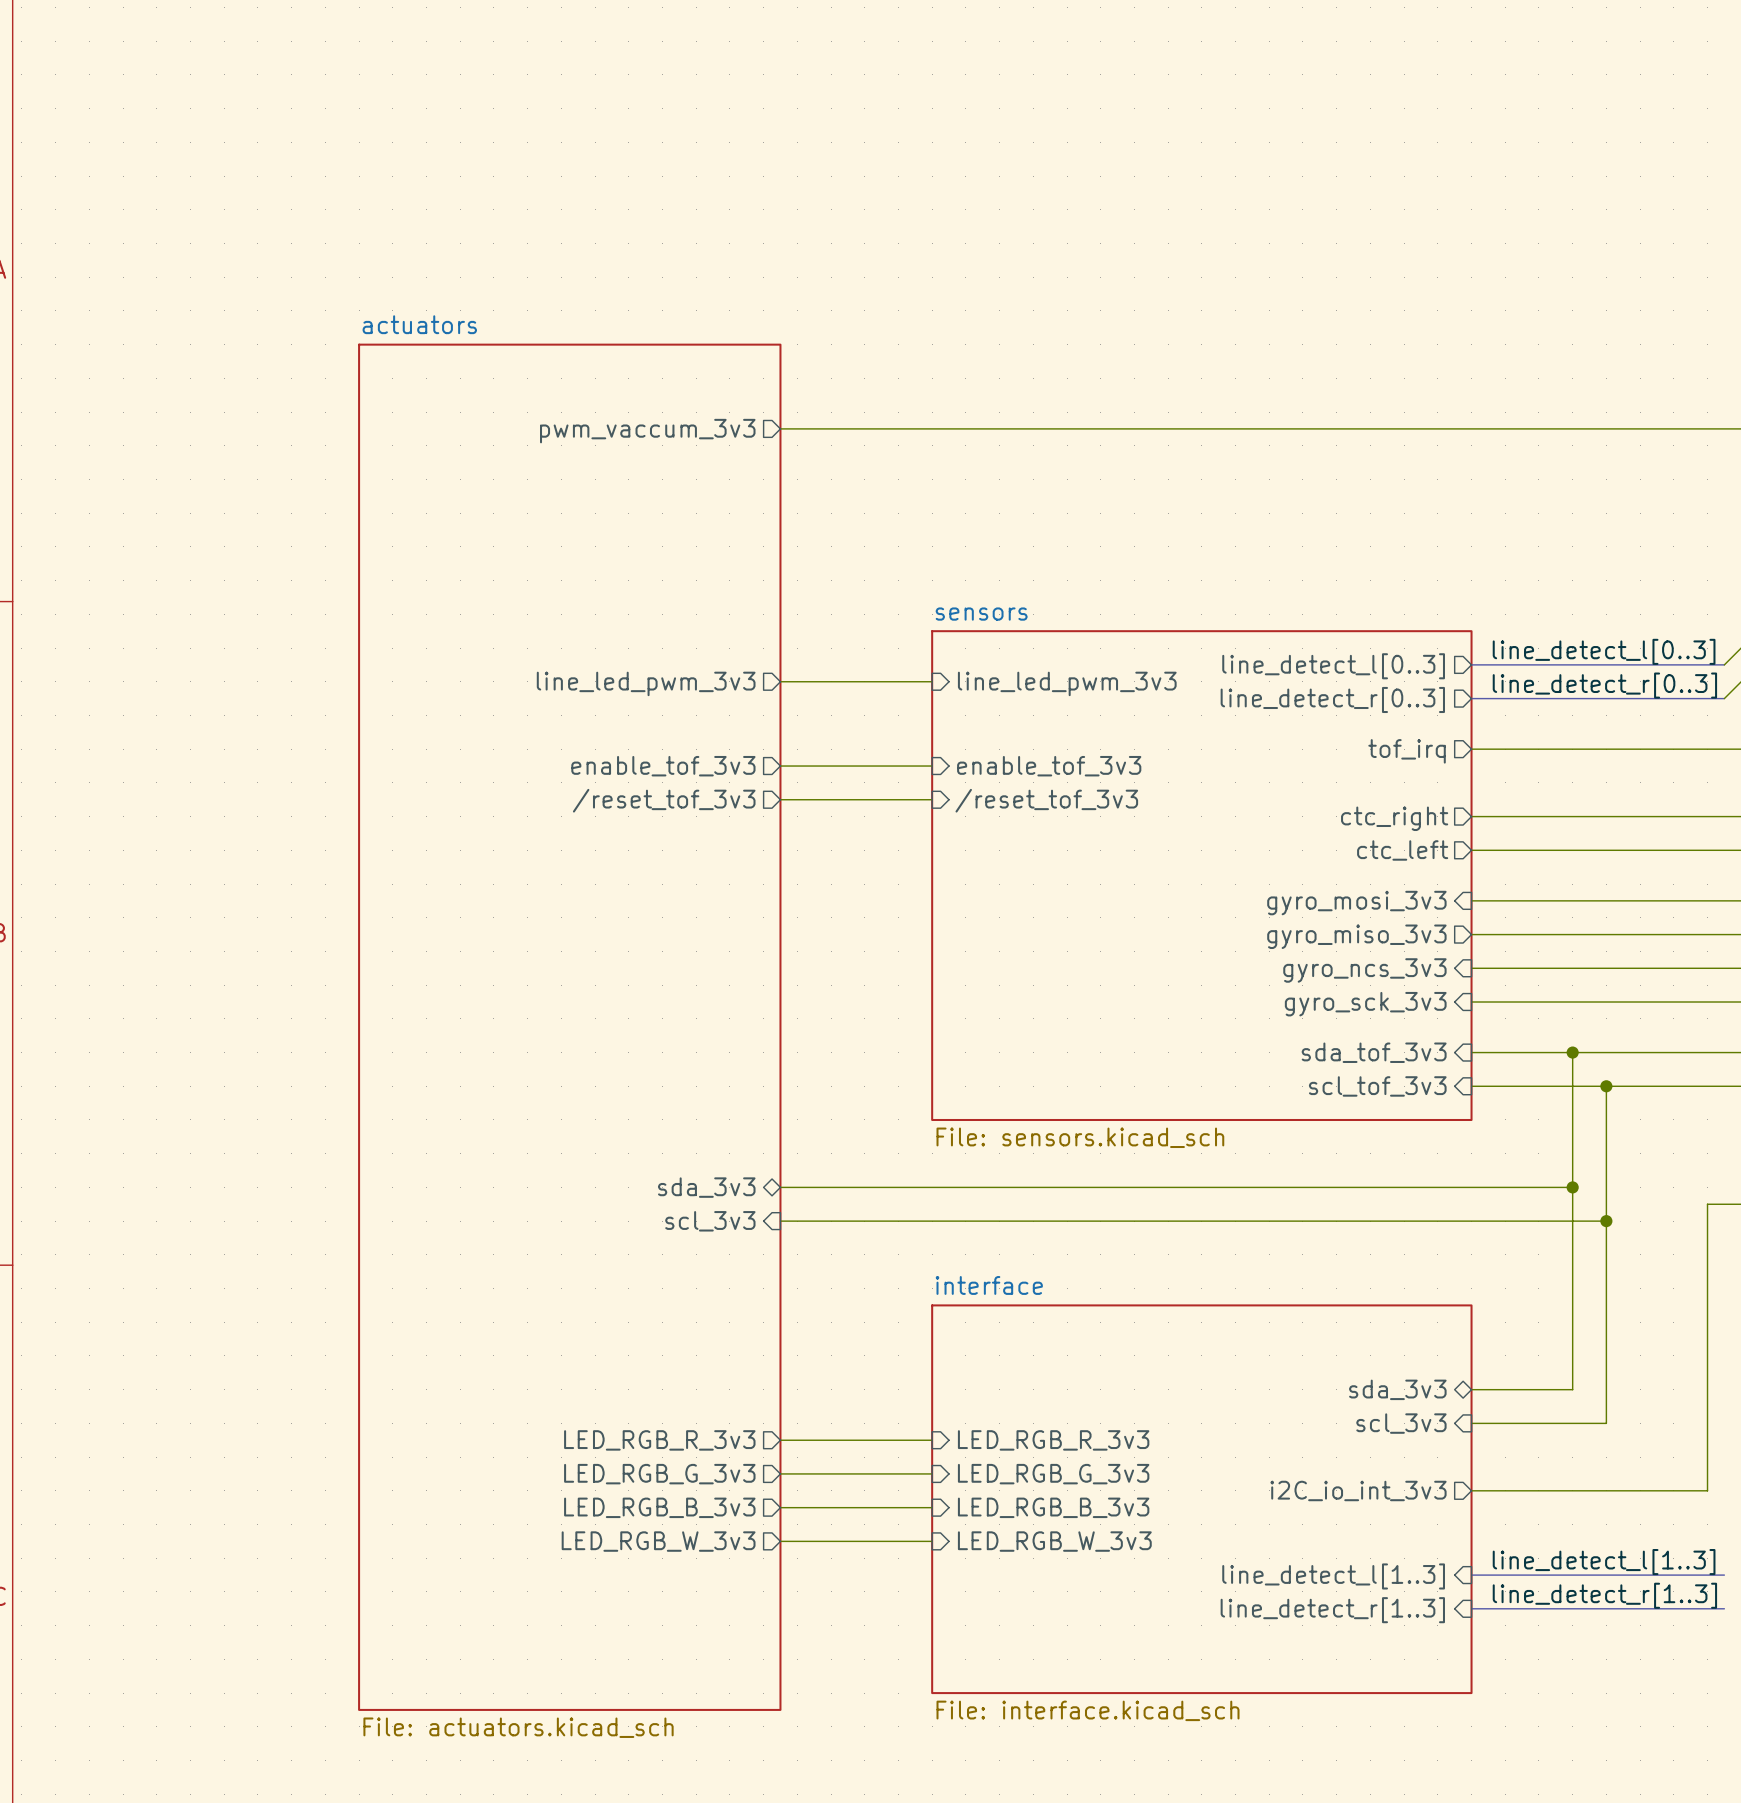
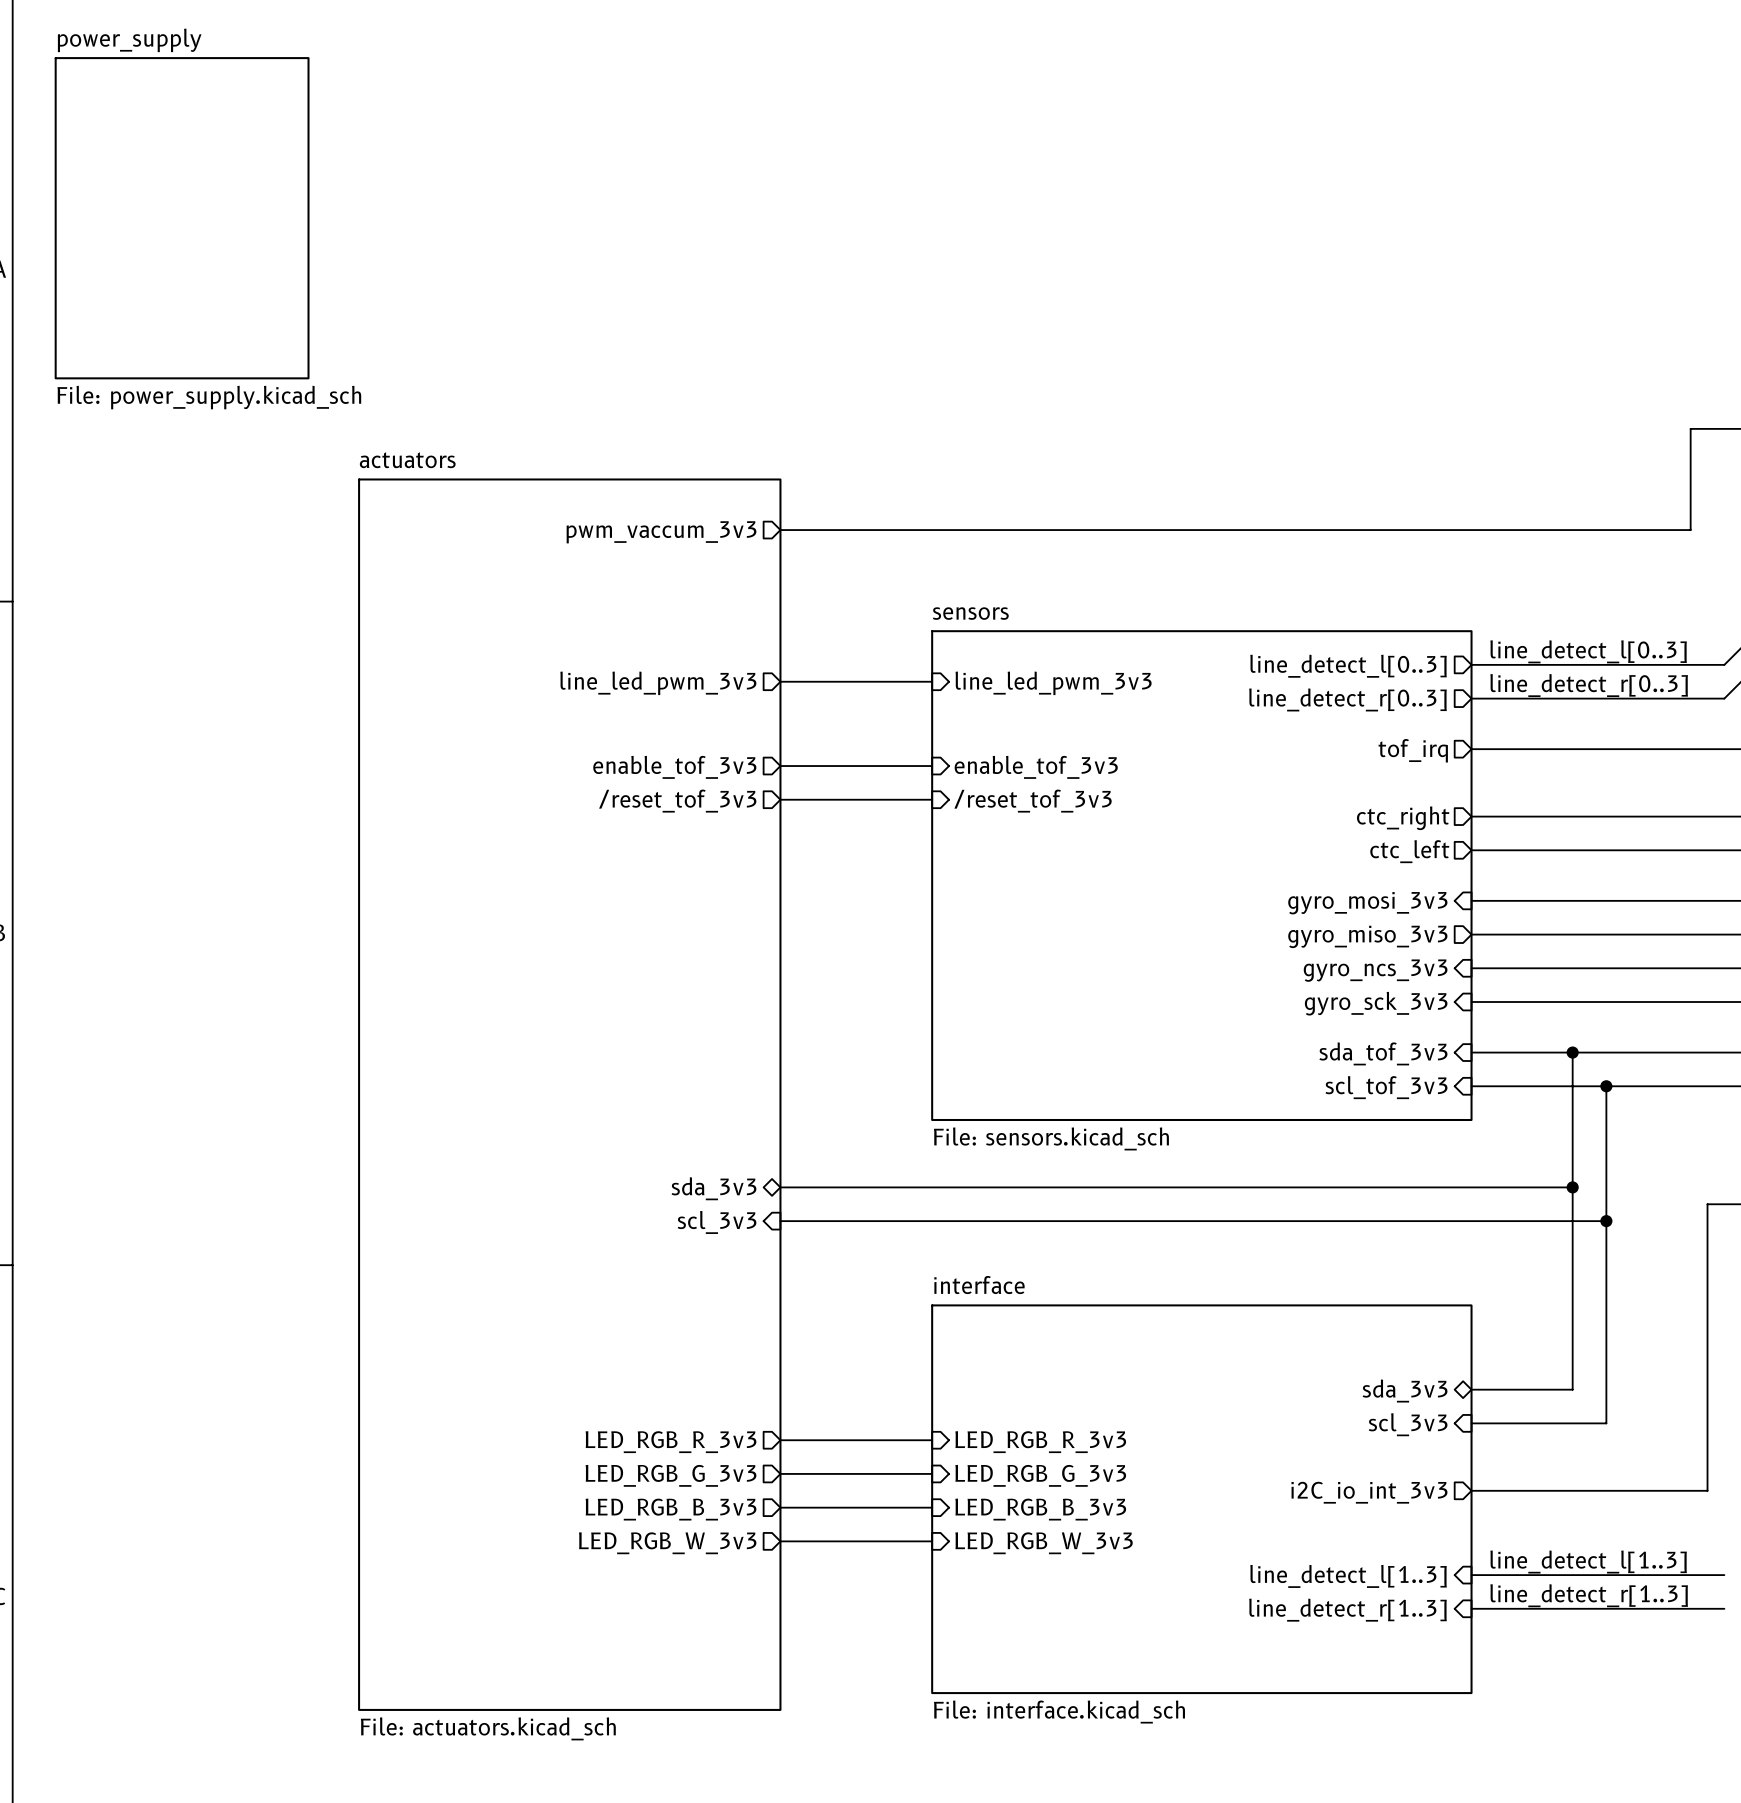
sheet power_supply: none -> File: power_supply.kicad_sch (182, 218)
wire: (780, 428) (1690, 428) -> (780, 530) (1690, 530) (1690, 428)
sheet pin position: pwm_vaccum_3v3 (647, 431) -> pwm_vaccum_3v3 (661, 532)
sheet actuators: File: actuators.kicad_sch (569, 1027) -> none
sheet actuators: none -> File: actuators.kicad_sch (569, 1094)

